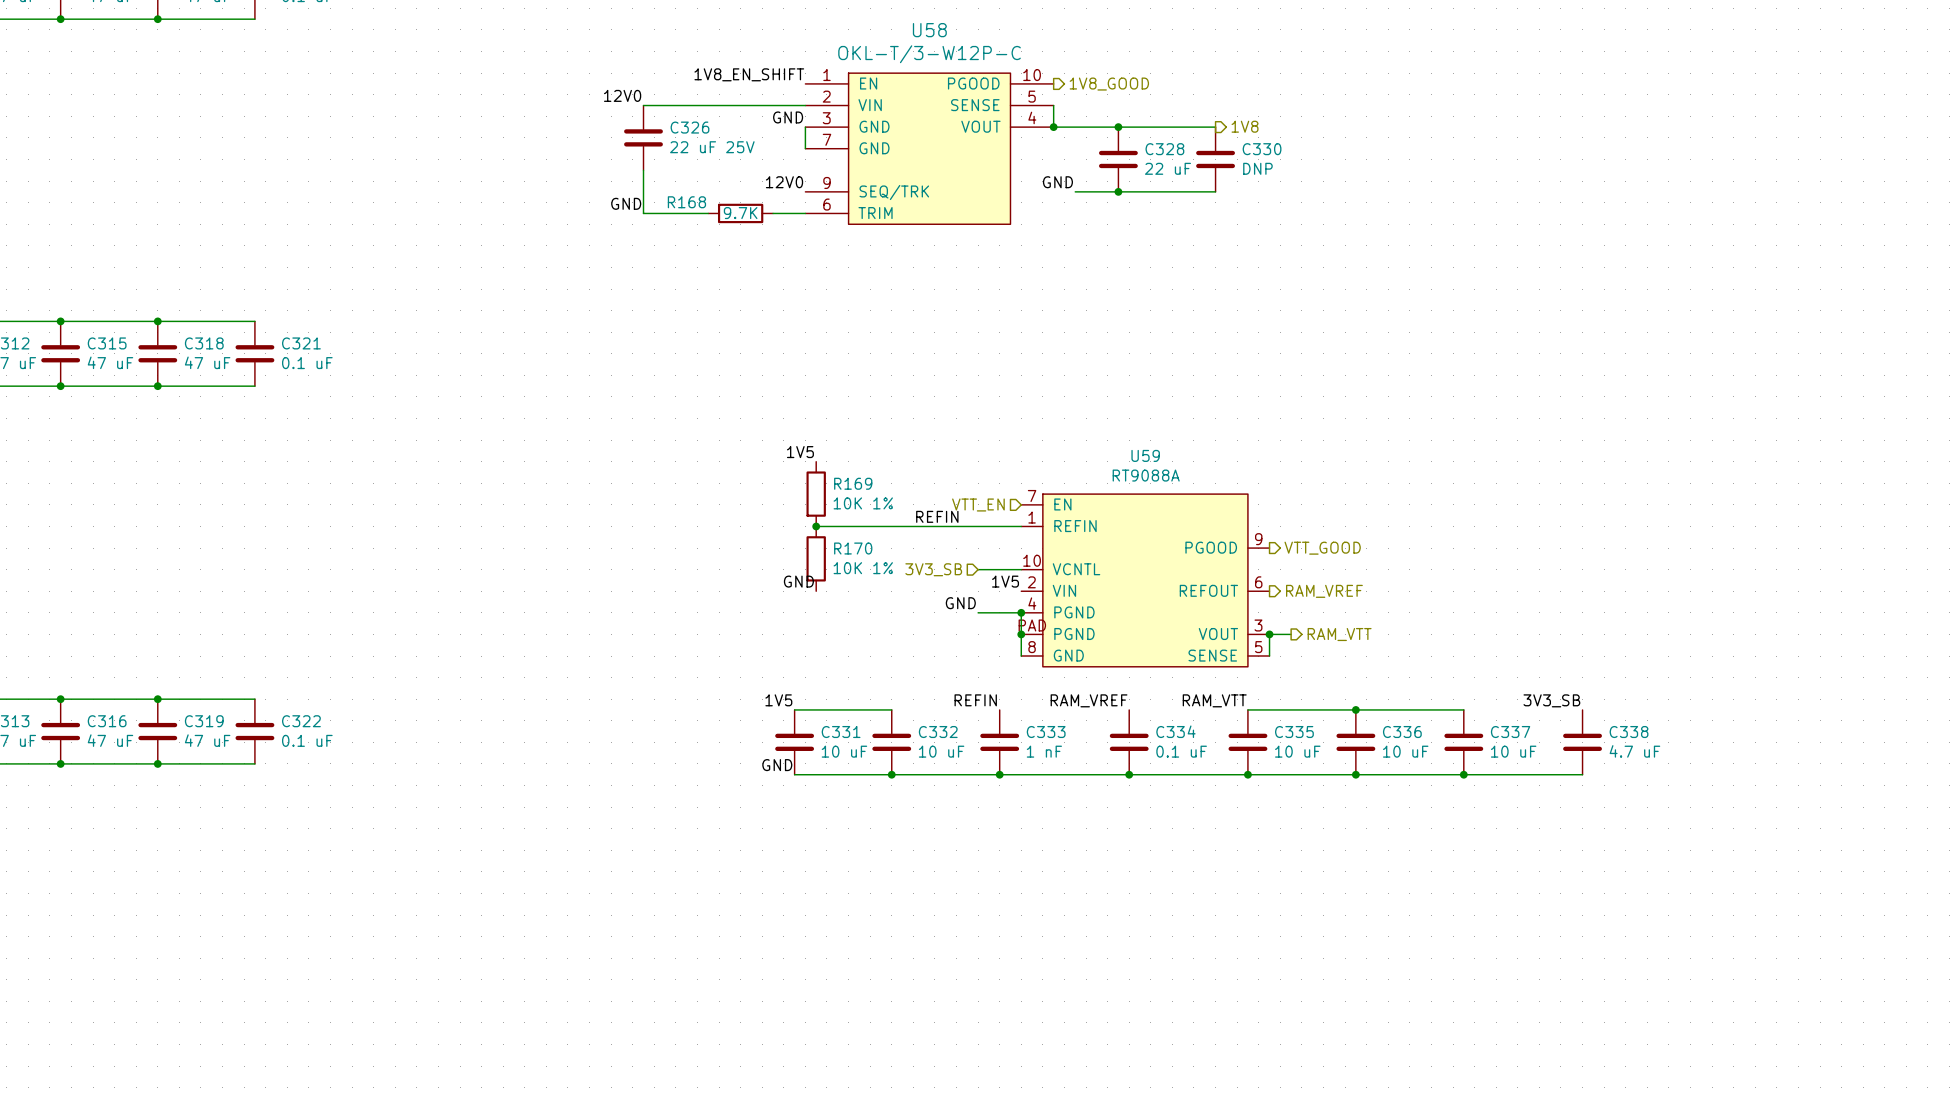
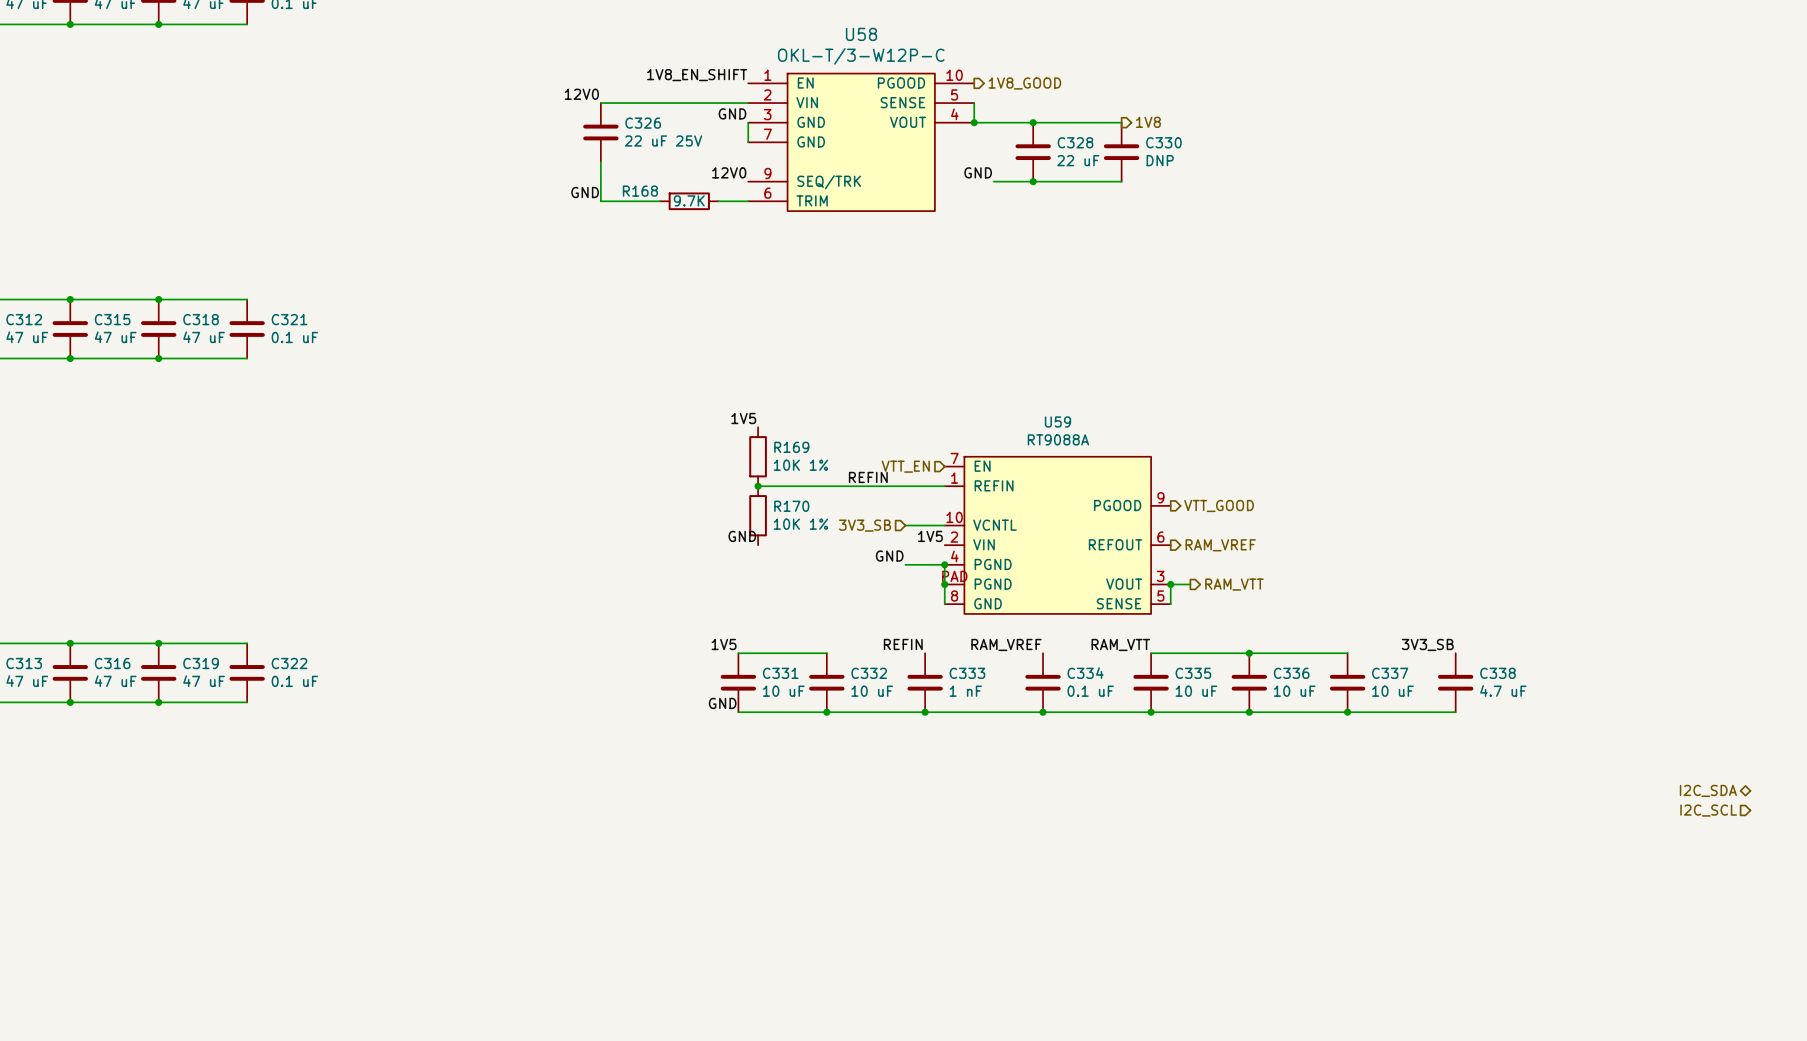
hierarchical label: none -> I2C_SDA (1708, 790)
hierarchical label: none -> I2C_SCL (1708, 810)

